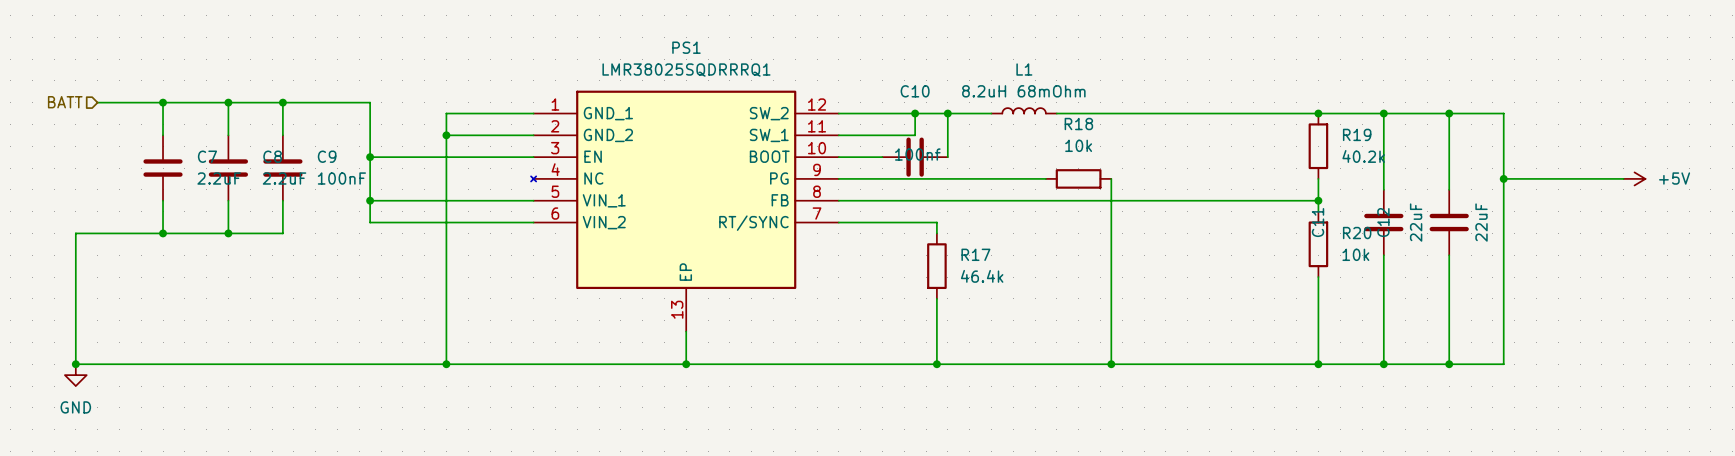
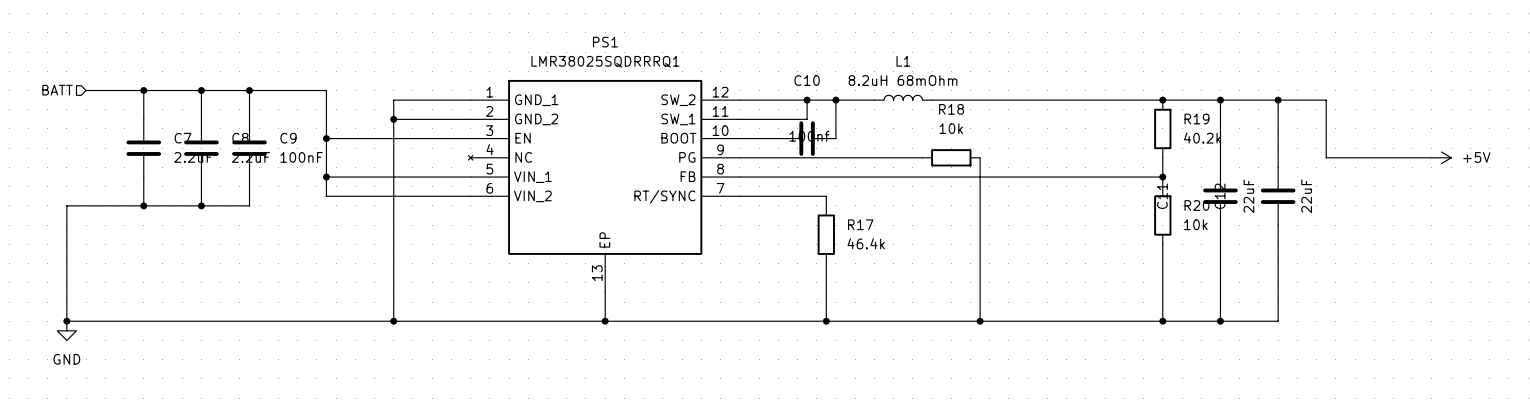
wire: (1503, 178) (1503, 364) (1449, 364) -> none
junction: (1503, 178) -> none
junction: (1449, 364) -> none

